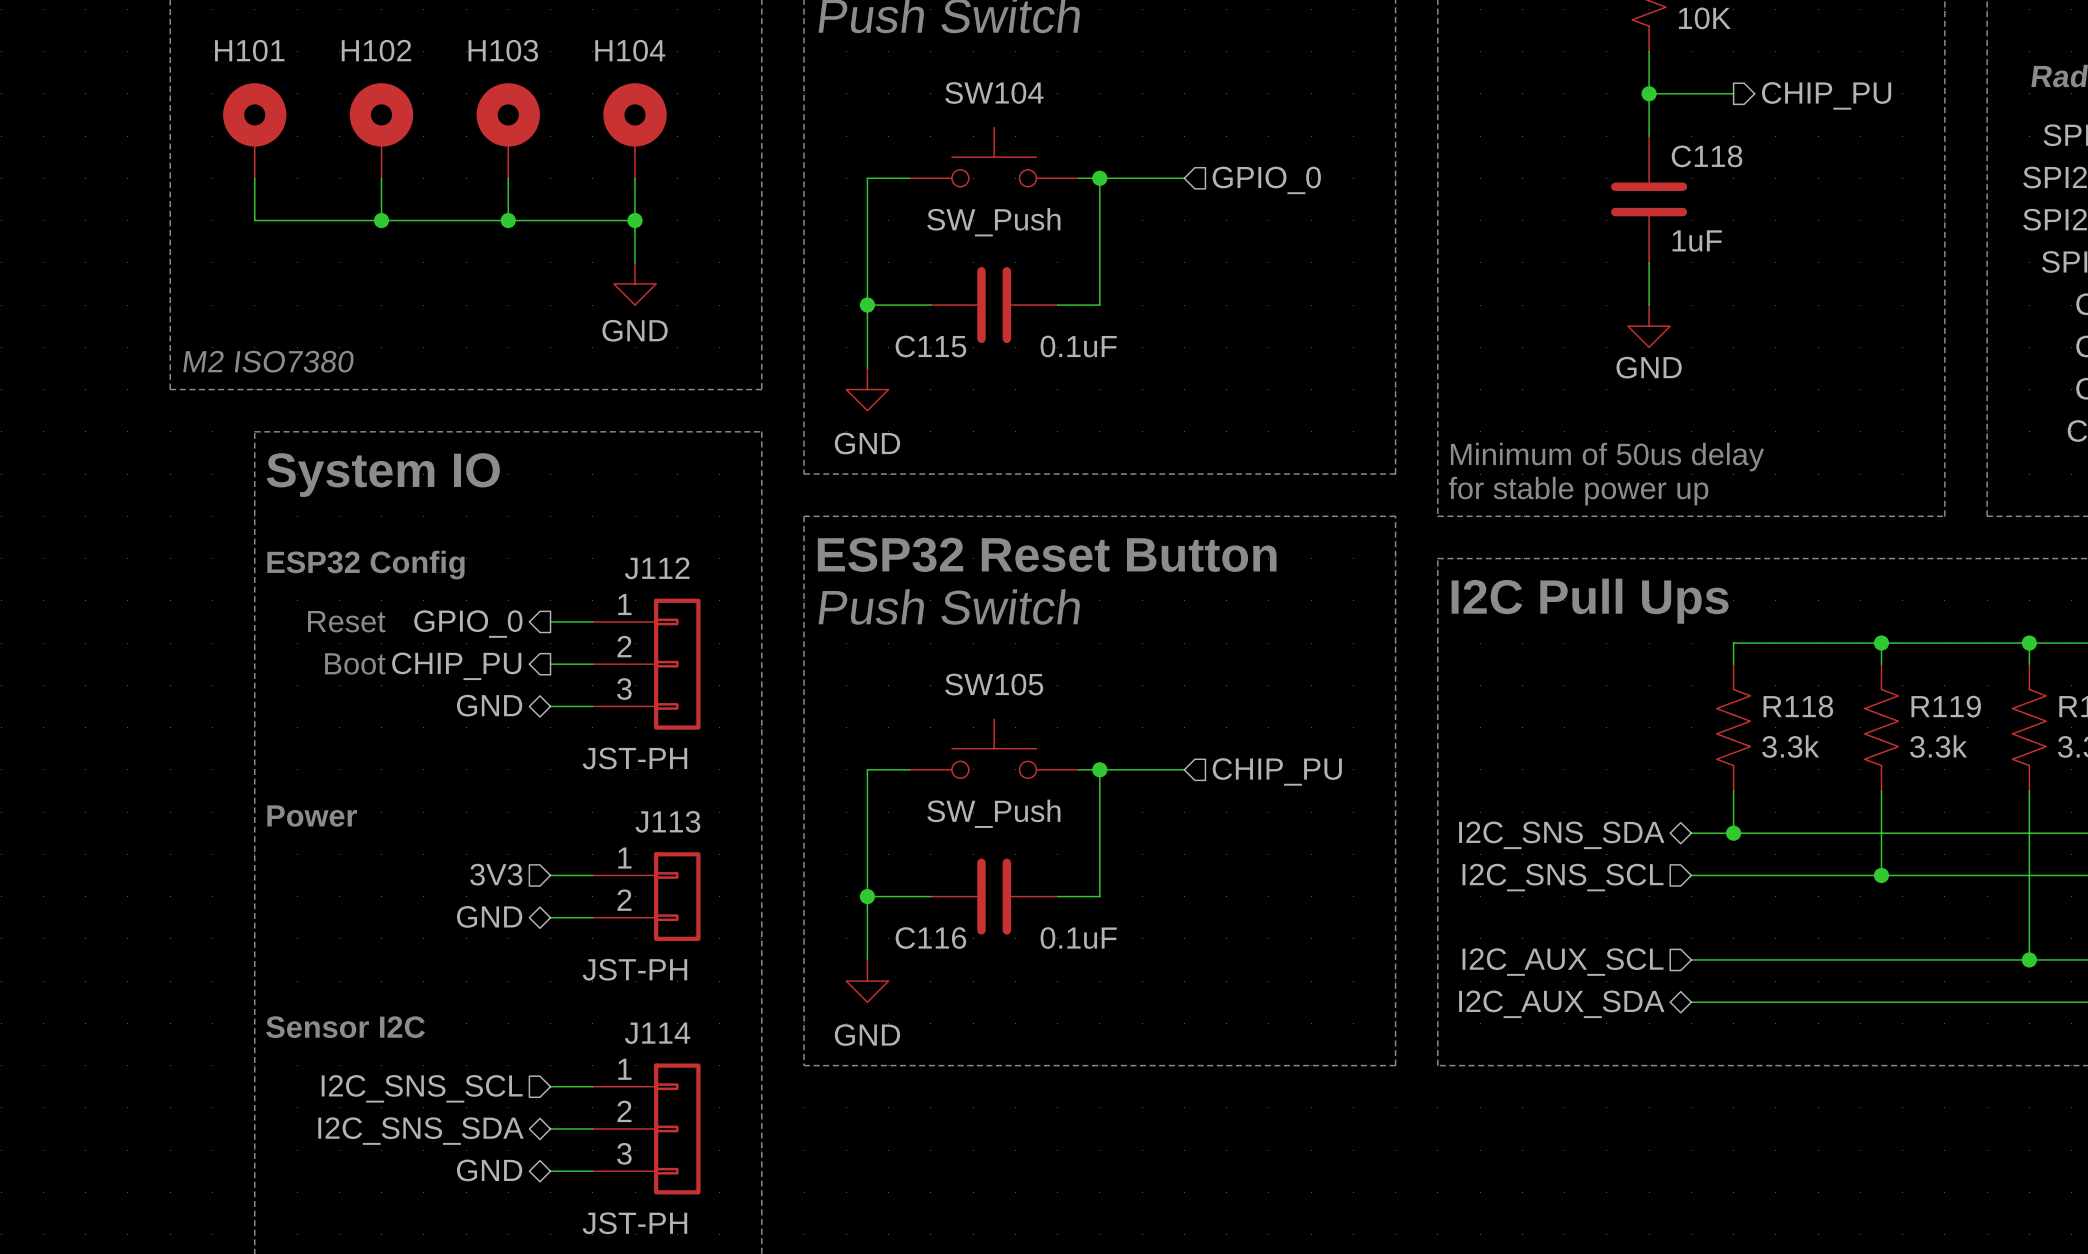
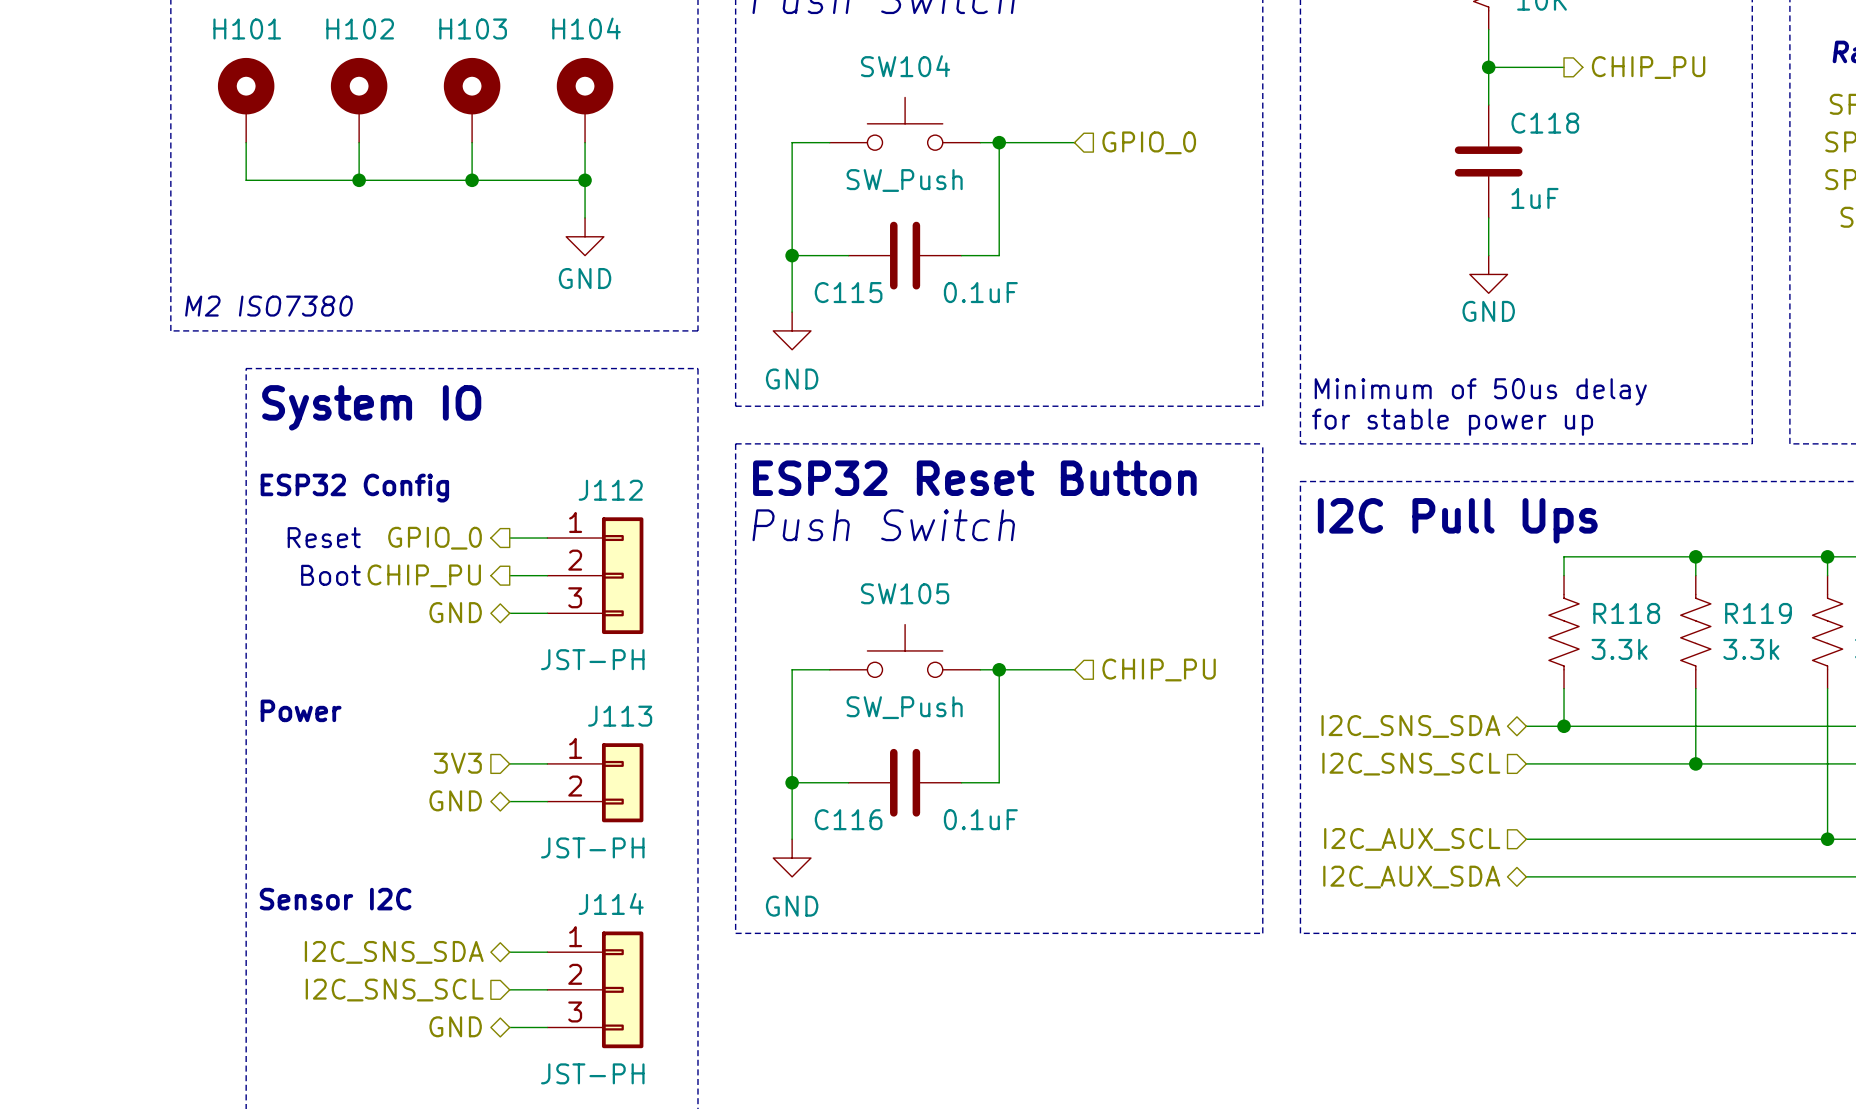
hierarchical label shape: input (422, 1088) -> bidirectional (394, 952)
hierarchical label: I2C_SNS_SCL (422, 1088) -> I2C_SNS_SDA (394, 952)
hierarchical label shape: bidirectional (420, 1131) -> input (394, 990)
hierarchical label: I2C_SNS_SDA (420, 1131) -> I2C_SNS_SCL (394, 990)

